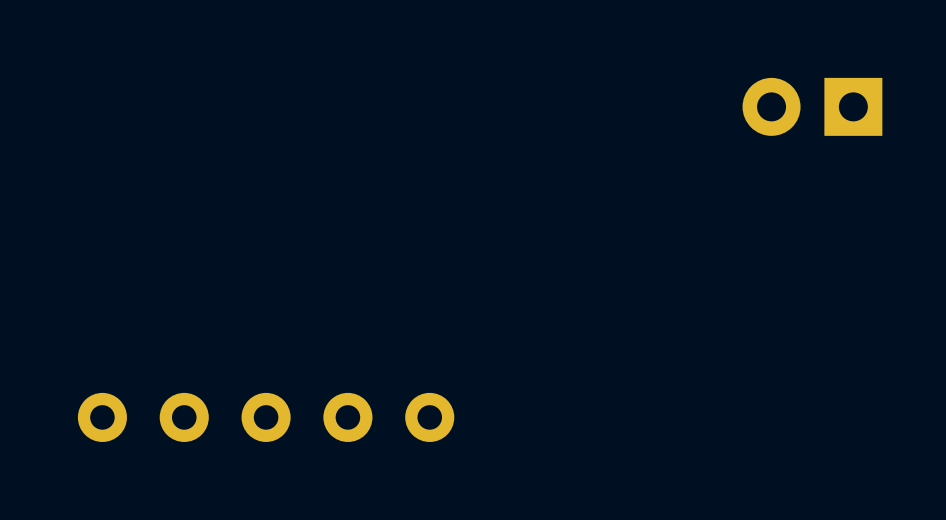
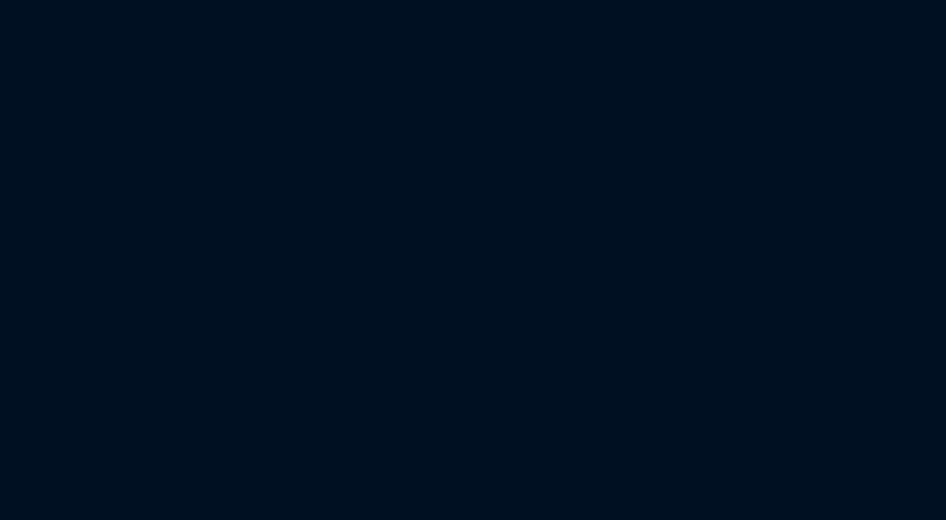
part: (812, 106) -> none
part: (266, 417) -> none

